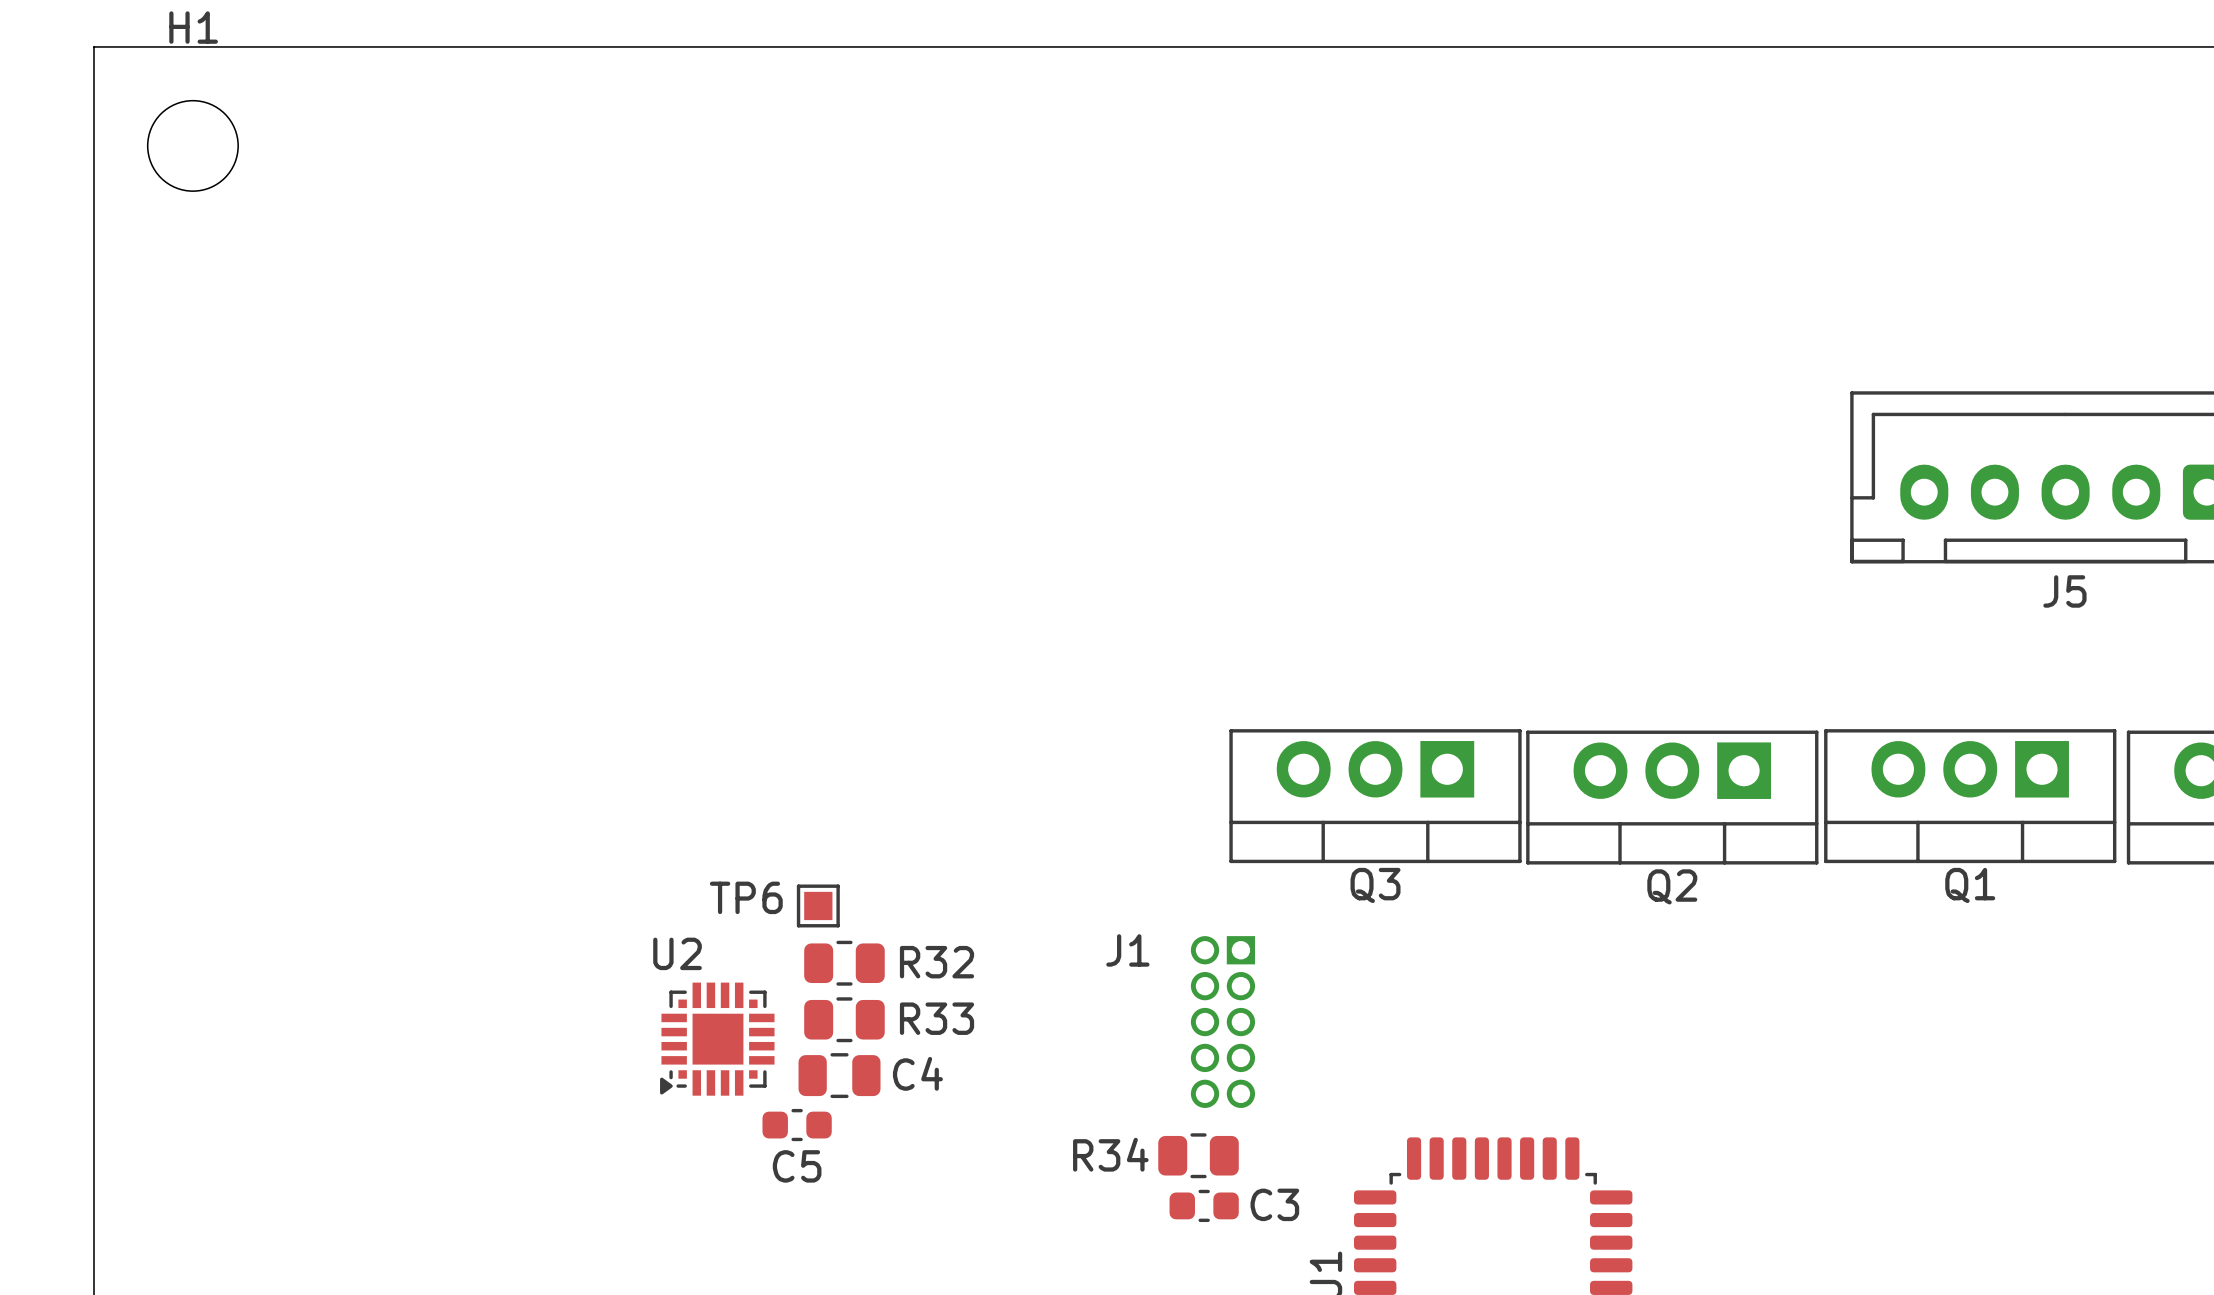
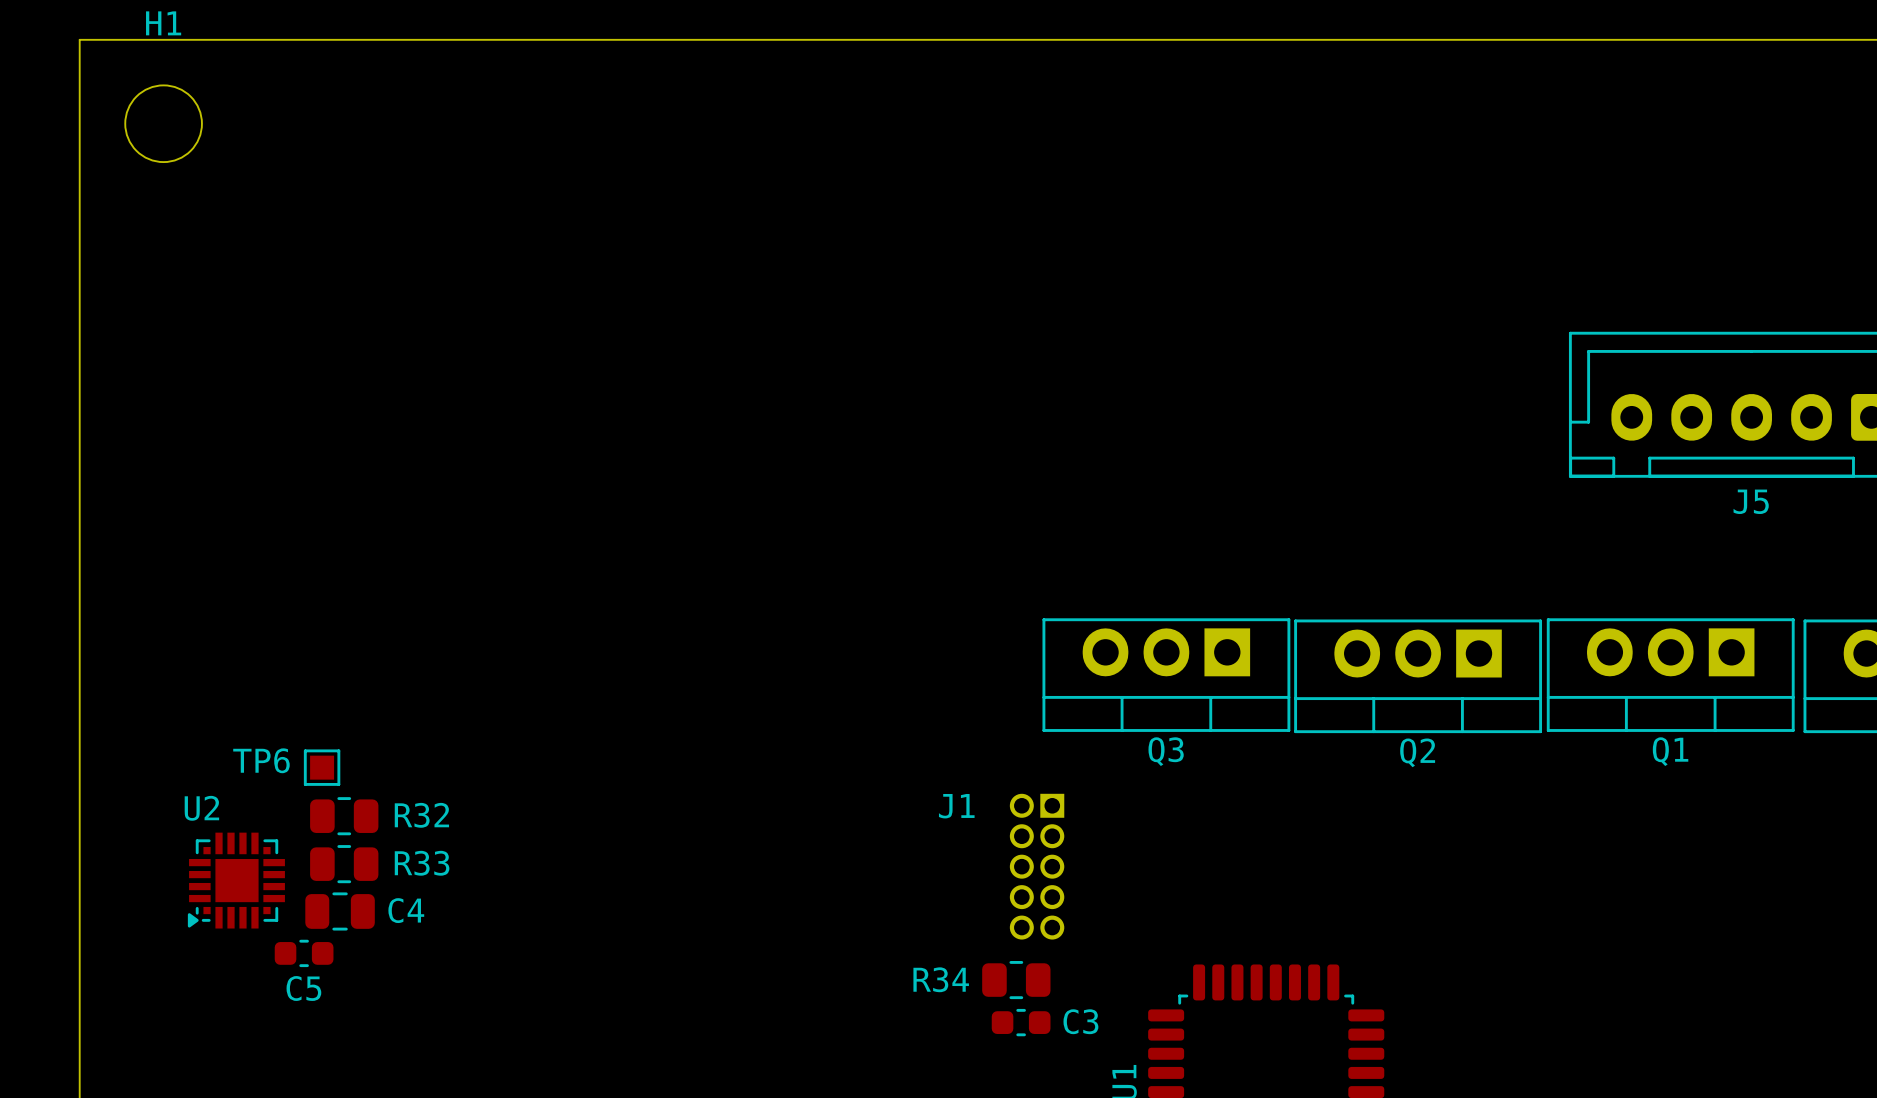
TP6 position: (818, 905) -> (322, 767)
R32 position: (844, 963) -> (344, 816)
R33 position: (844, 1019) -> (344, 864)
U2 position: (717, 1039) -> (236, 880)
C4 position: (839, 1075) -> (340, 911)
C5 position: (797, 1125) -> (304, 953)

